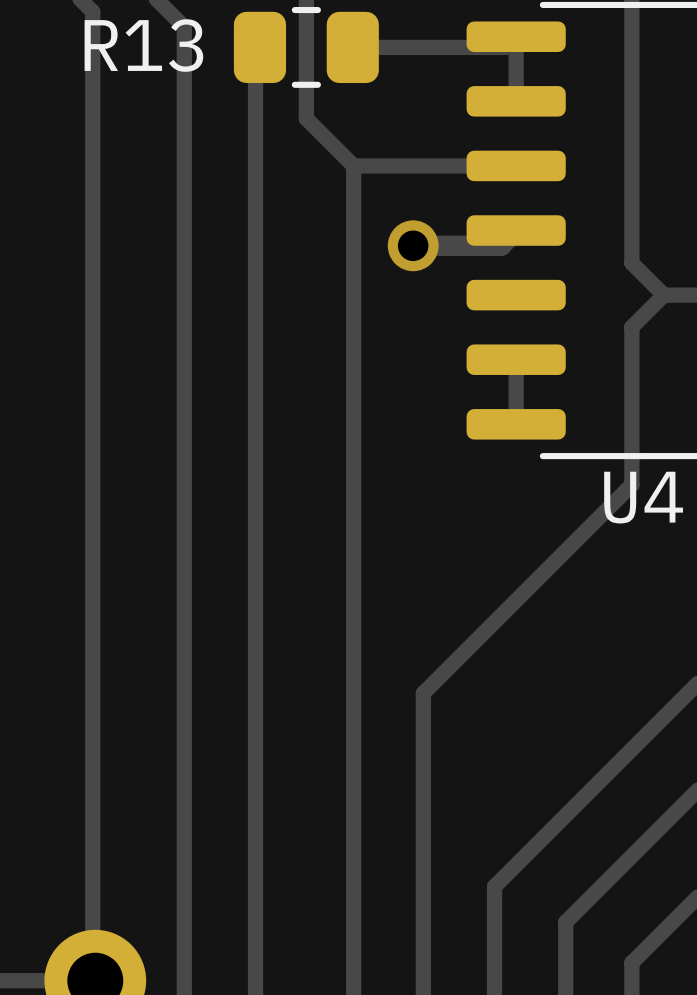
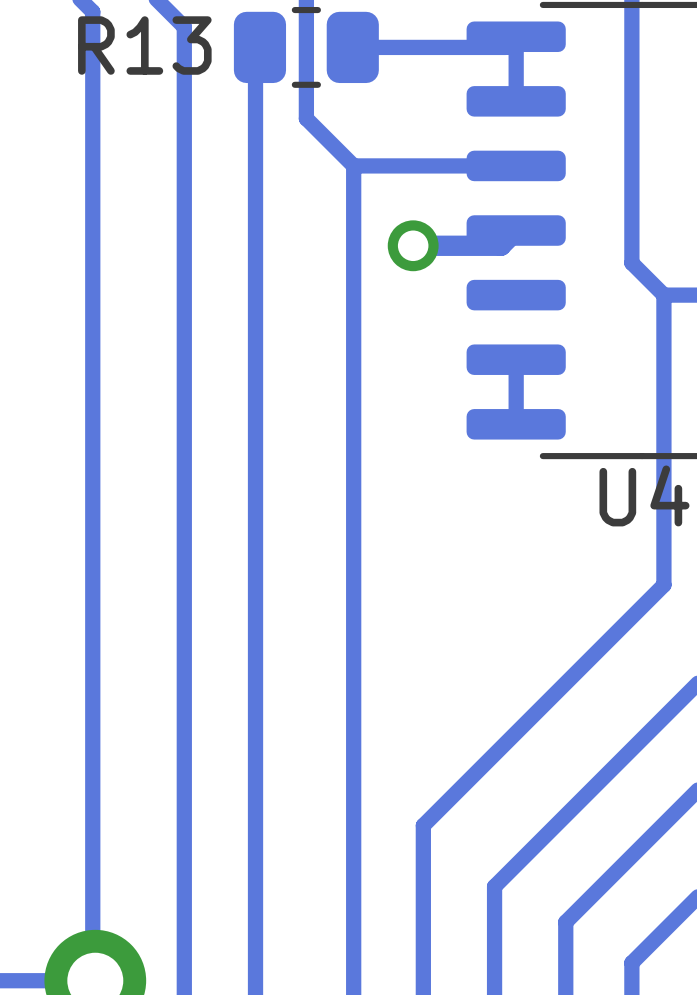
track: (663, 295) (631, 327) (631, 484) (423, 693) (423, 825) -> (663, 295) (663, 585) (423, 825)

